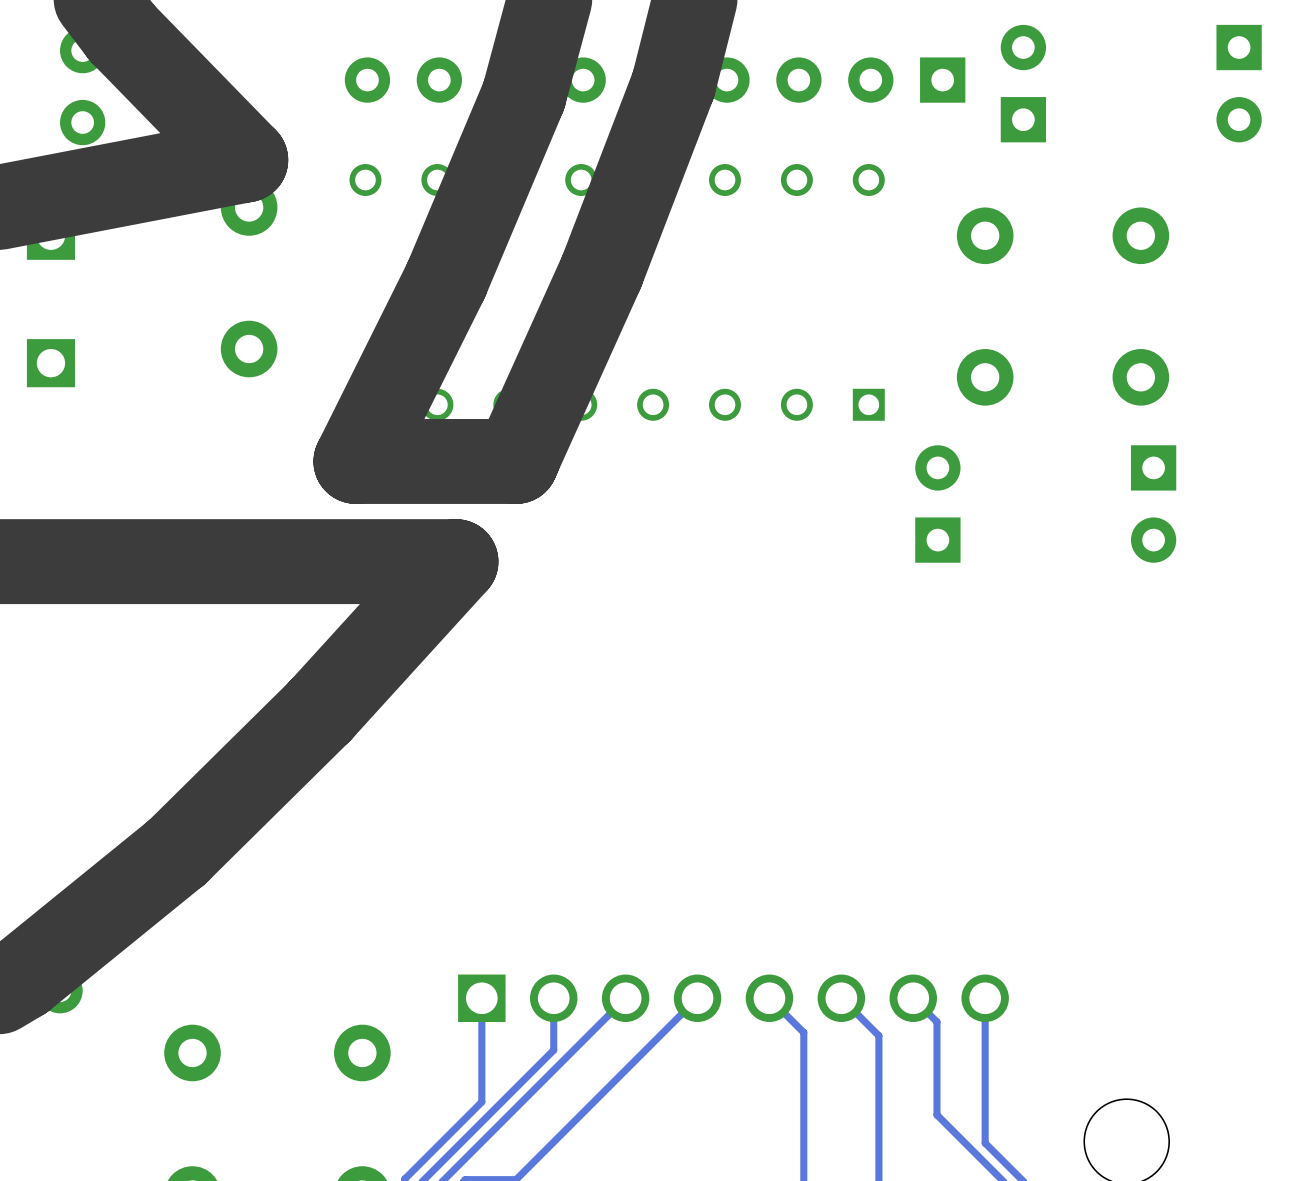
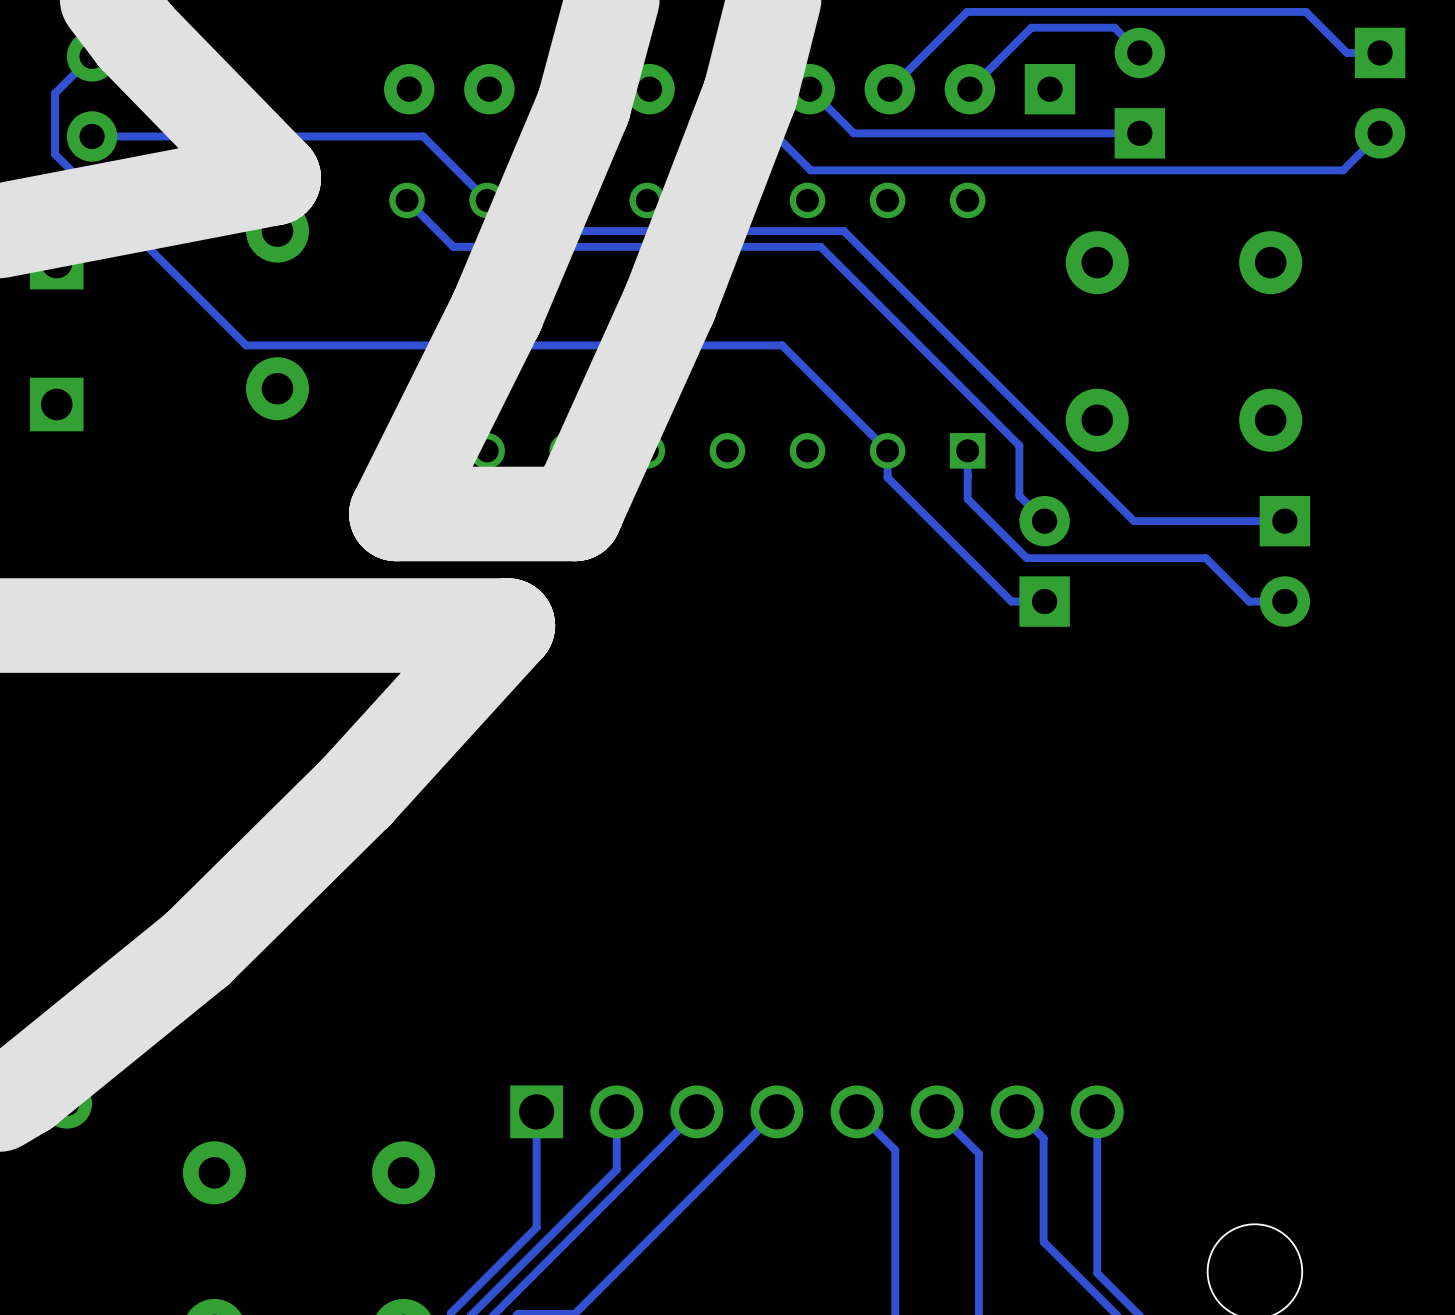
track: none -> (1139, 52) (1114, 27) (1031, 27) (969, 89)
track: none -> (1380, 52) (1346, 52) (1306, 11) (967, 11) (889, 89)
track: none -> (92, 56) (55, 93) (55, 154) (246, 345) (782, 345) (887, 450) (887, 477) (1011, 601) (1044, 601)
track: none -> (729, 89) (810, 170) (1343, 170) (1380, 133)
track: none -> (809, 89) (853, 133) (1139, 133)
track: none -> (92, 136) (423, 136) (517, 231) (843, 231) (1134, 521) (1284, 521)
track: none -> (407, 200) (453, 246) (820, 246) (1019, 445) (1019, 495) (1044, 521)
track: none -> (967, 450) (967, 499) (1026, 558) (1205, 558) (1249, 601) (1284, 601)

